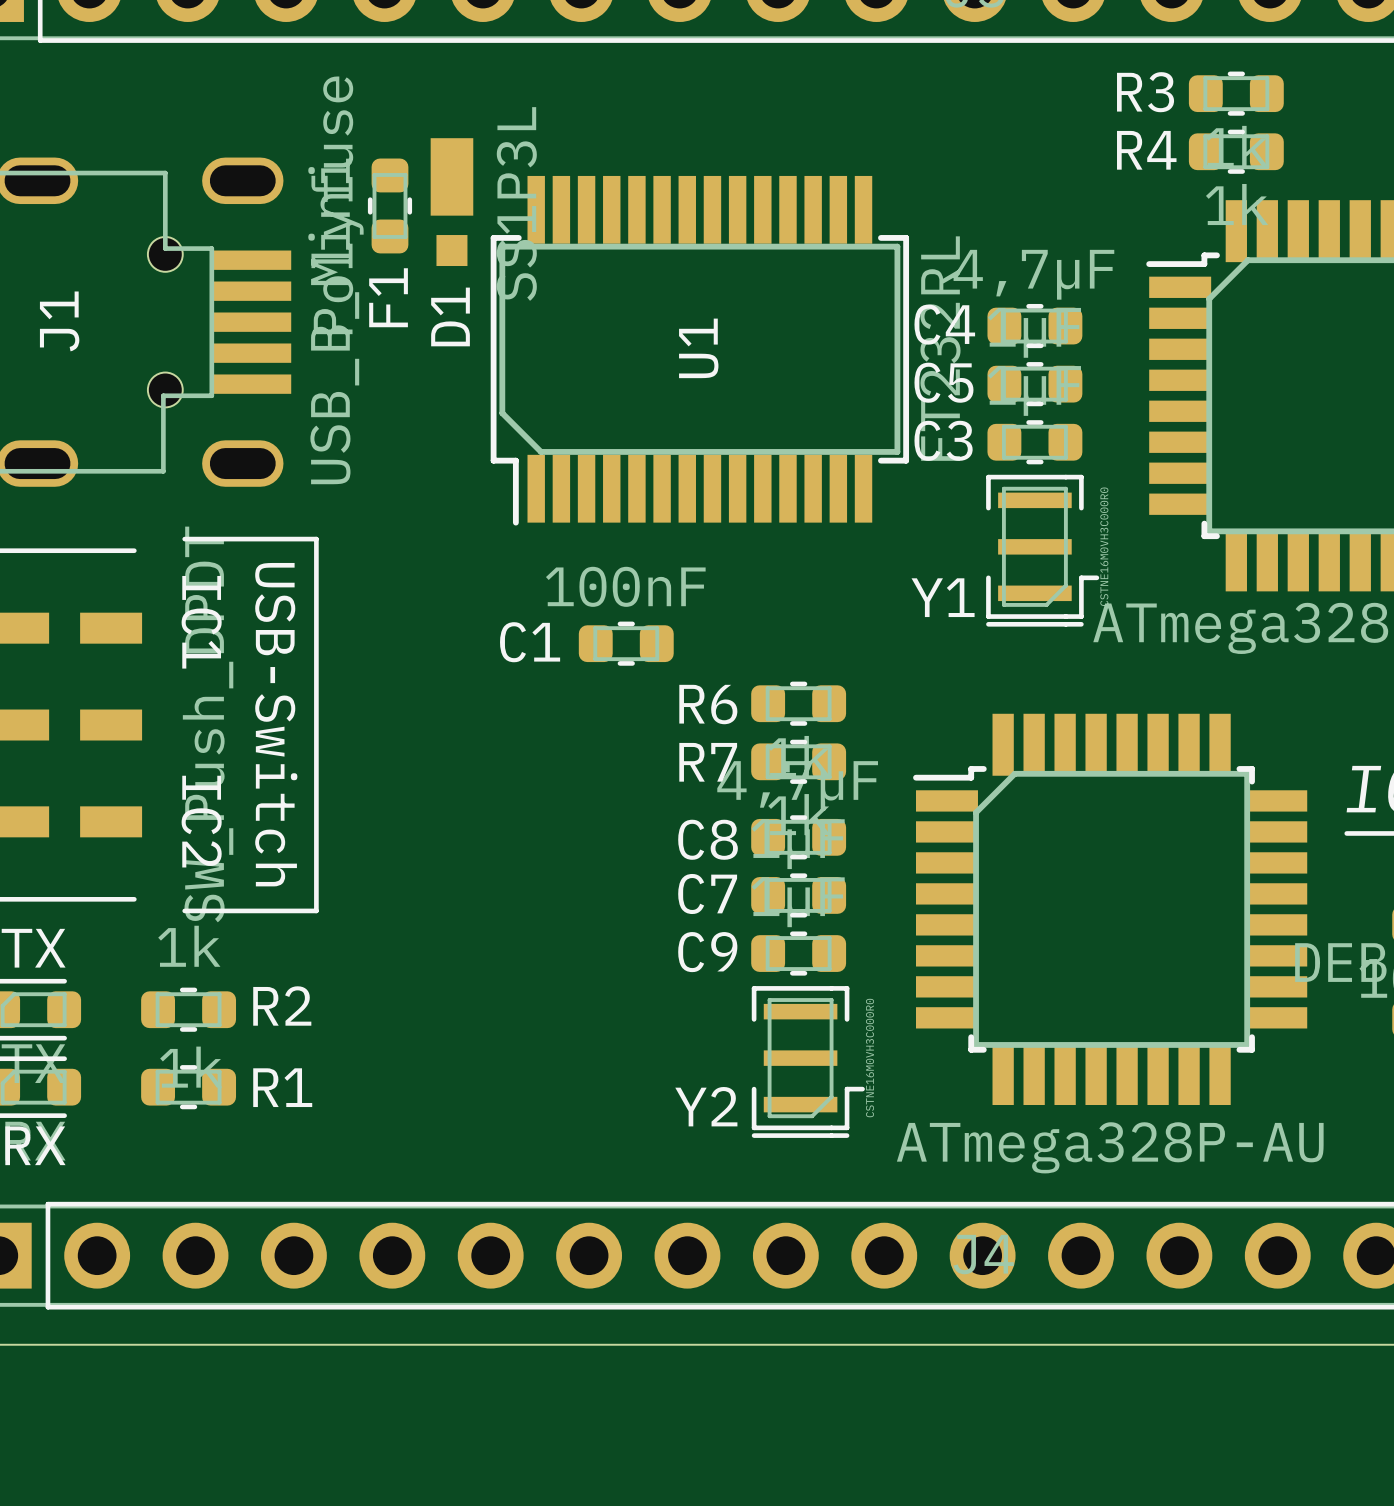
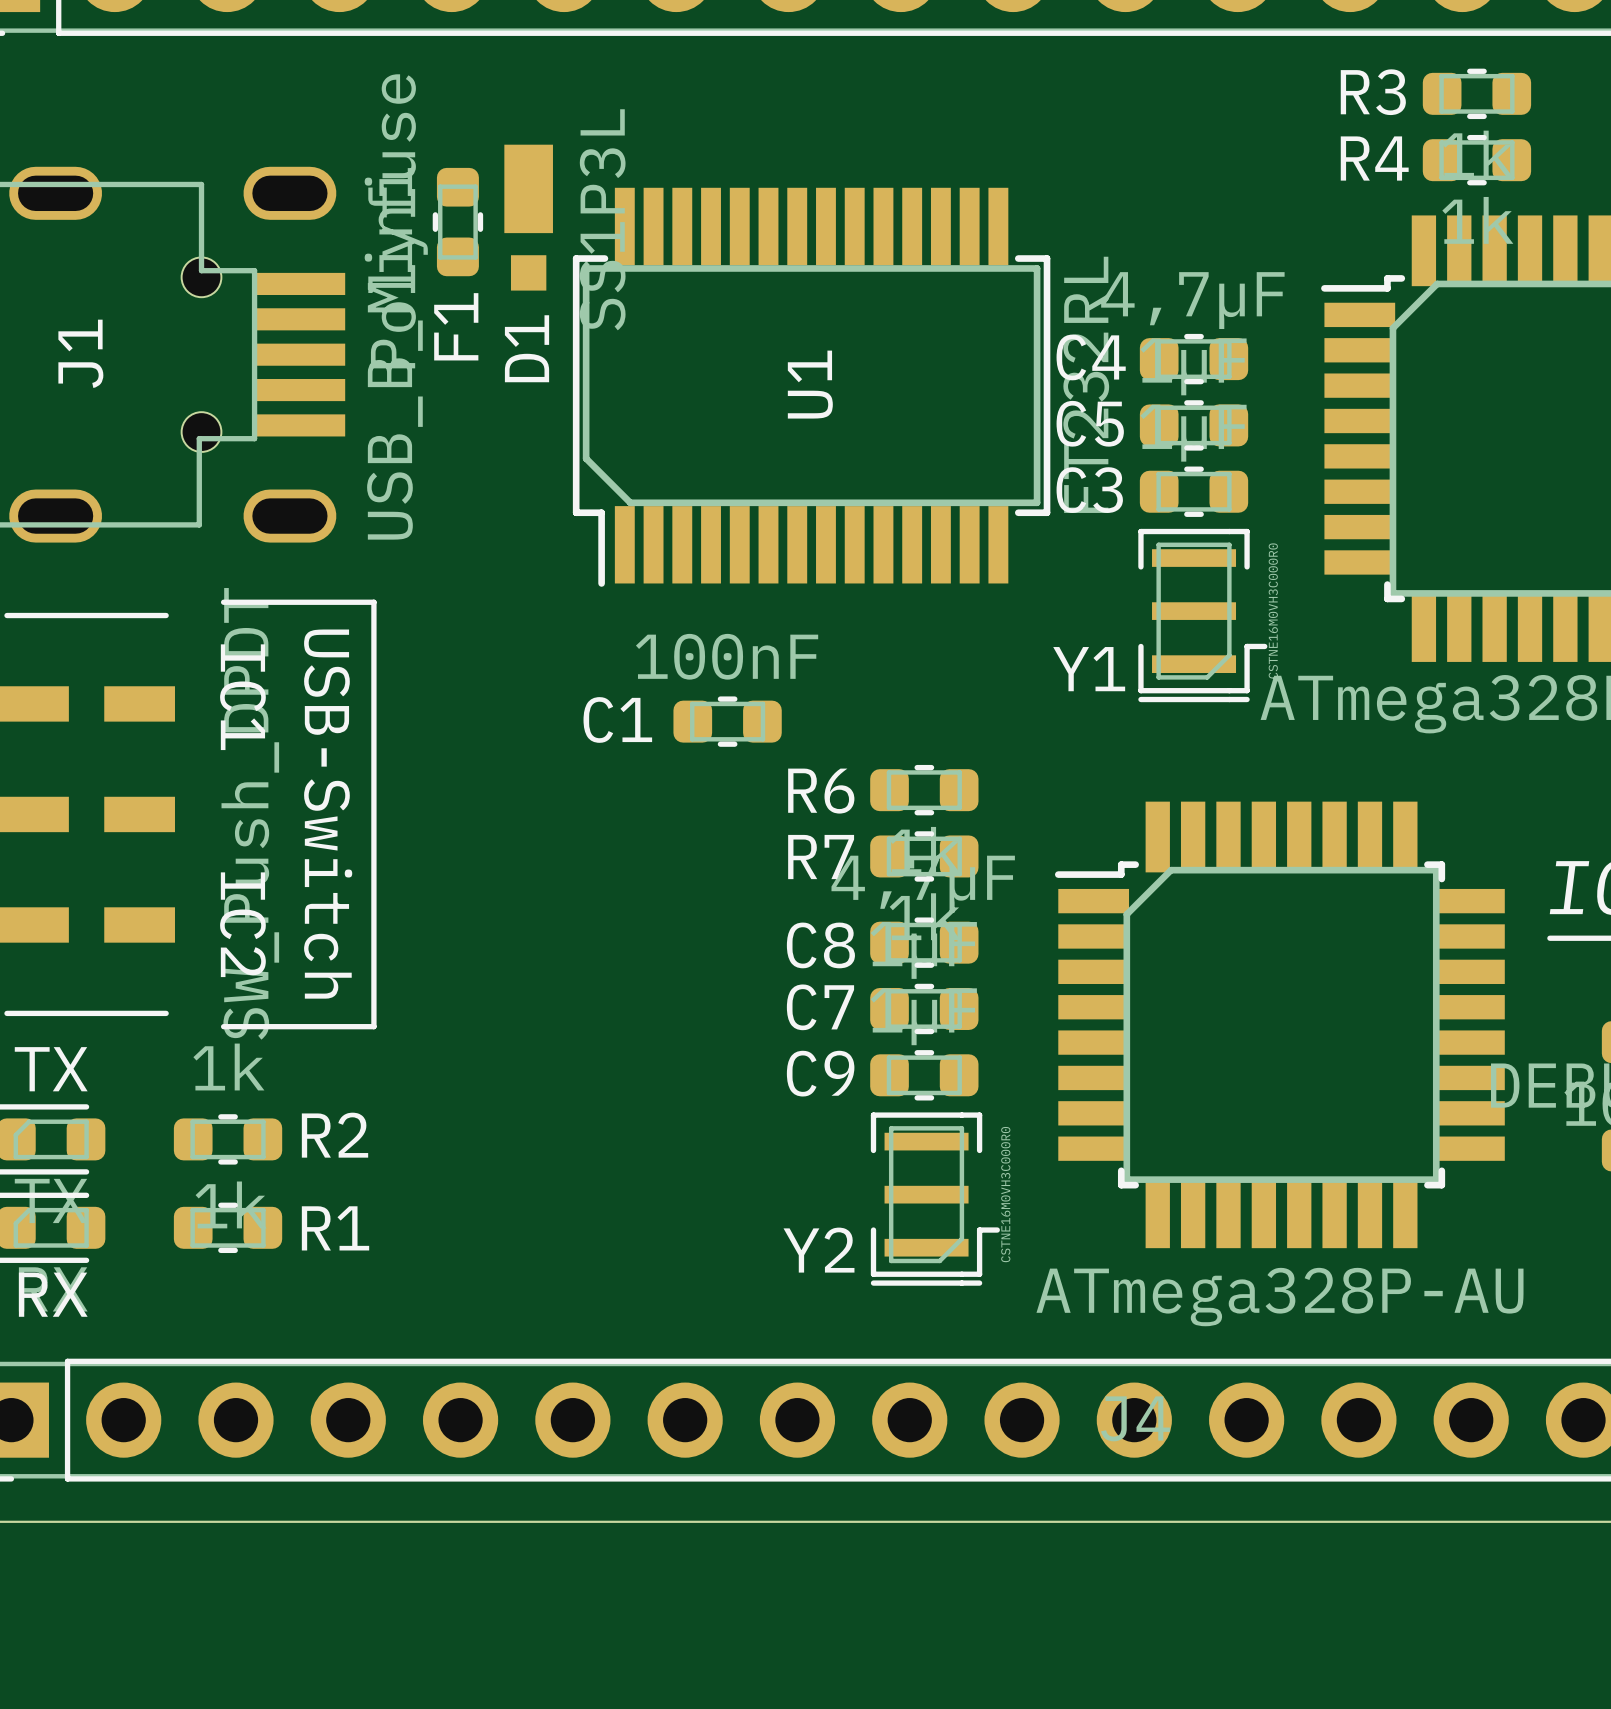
R3 position: (1236, 93) -> (1476, 93)
R4 position: (1236, 151) -> (1476, 160)

